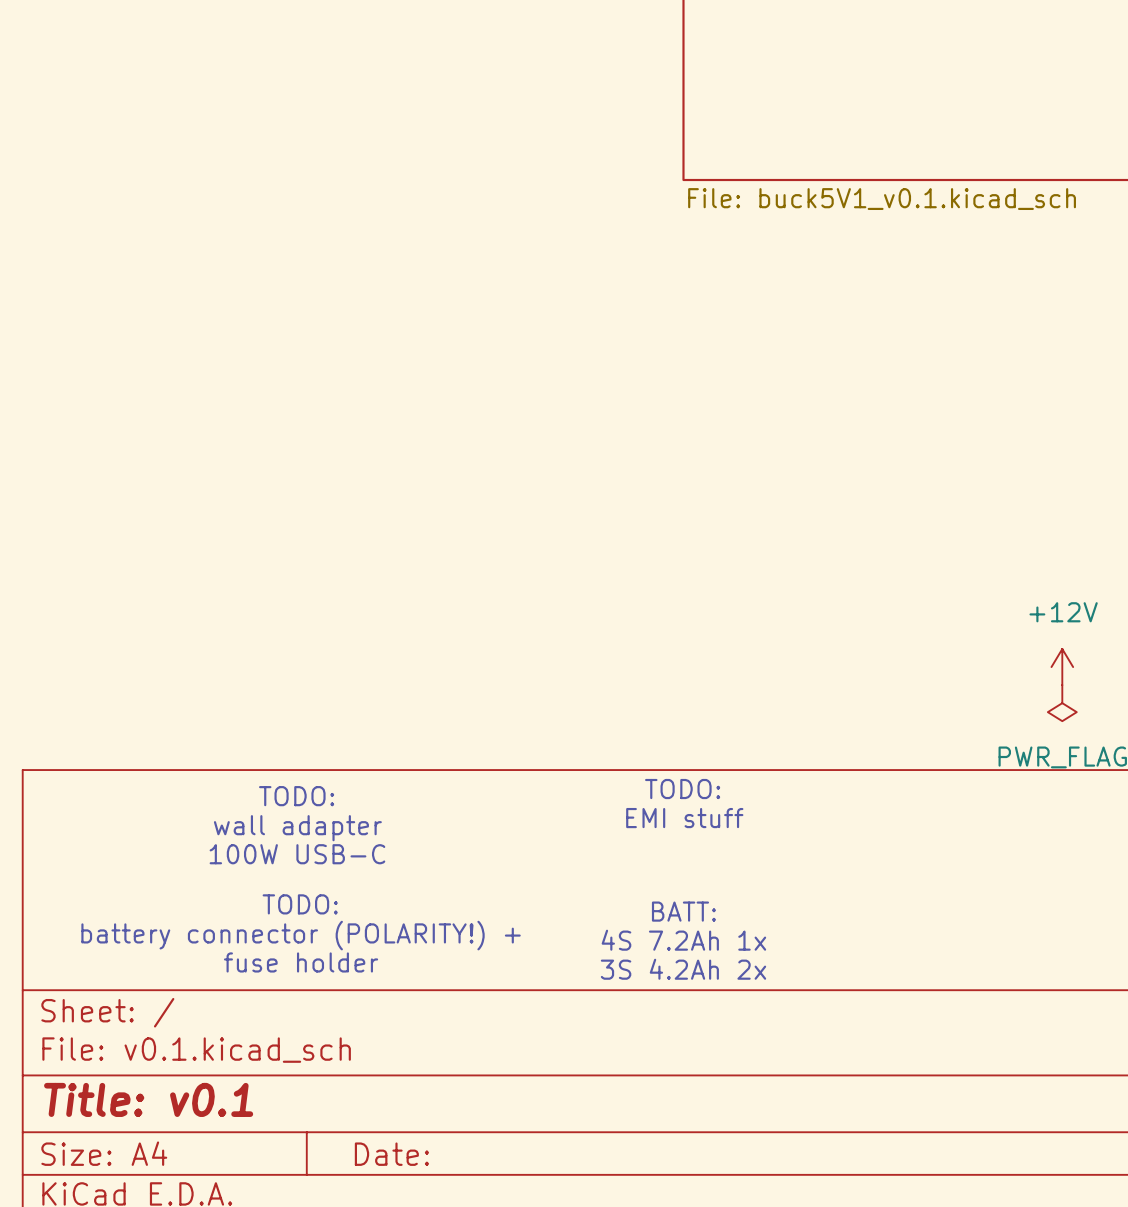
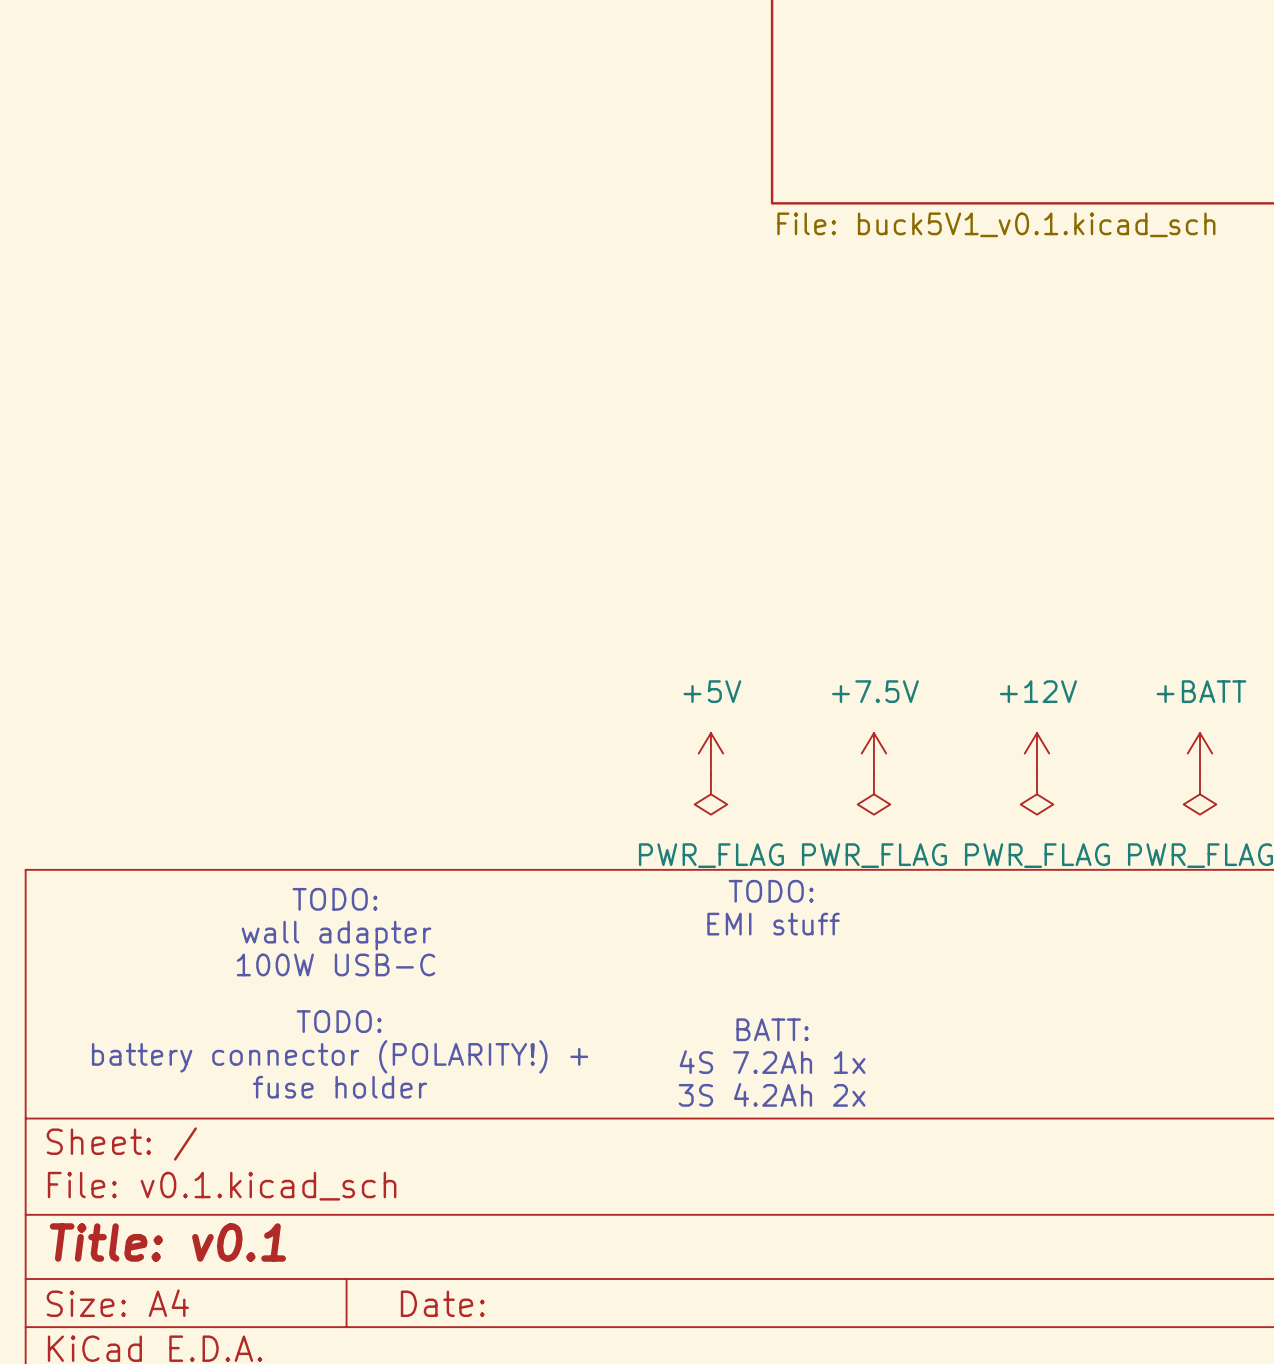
power symbol: none -> +5V (710, 753)
power symbol: none -> +7.5V (873, 753)
power symbol: none -> +12V (1036, 753)
power symbol: +12V (1062, 667) -> +BATT (1200, 753)
power symbol: none -> PWR_FLAG (710, 794)
power symbol: none -> PWR_FLAG (873, 794)
power symbol: none -> PWR_FLAG (1036, 794)

